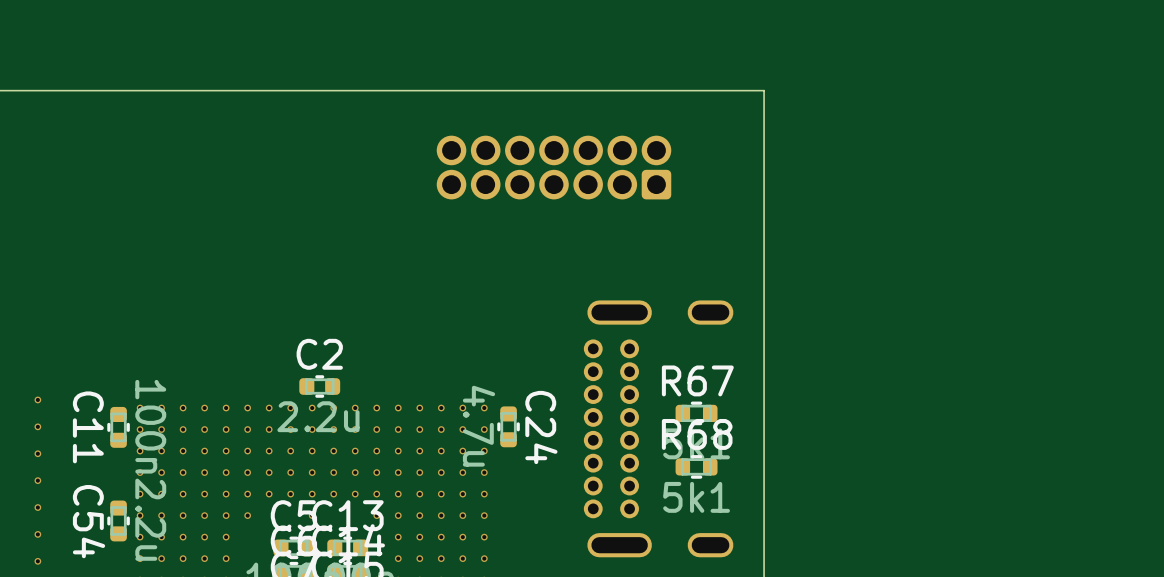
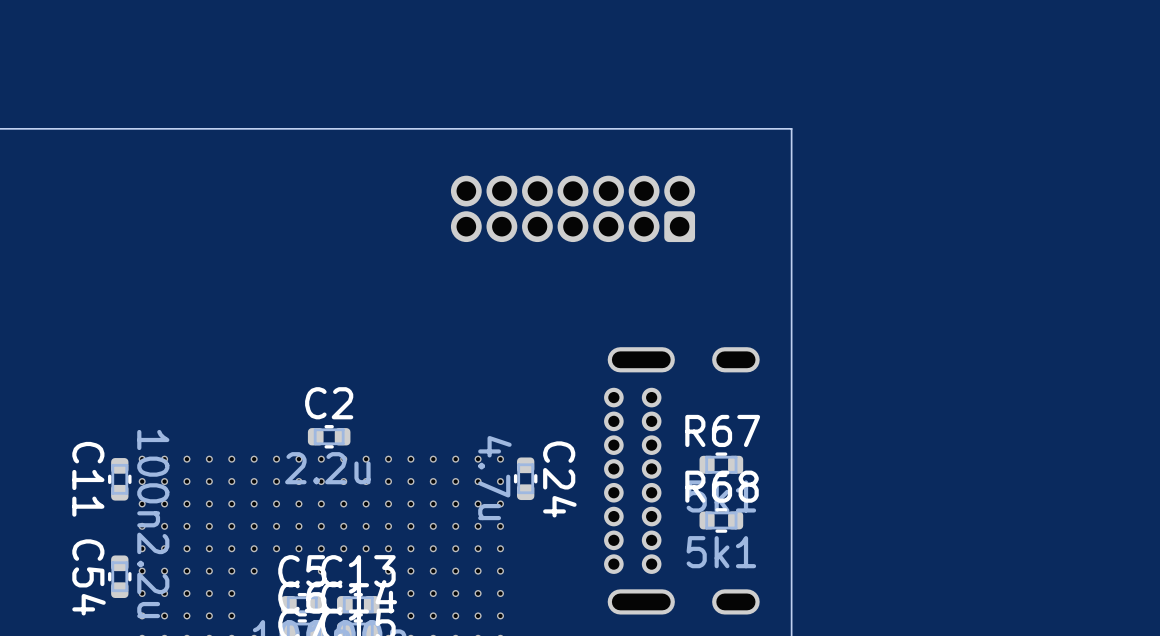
via: (37, 399) -> none
via: (37, 426) -> none
via: (37, 453) -> none
via: (37, 480) -> none
via: (37, 507) -> none
via: (37, 534) -> none
via: (37, 561) -> none

